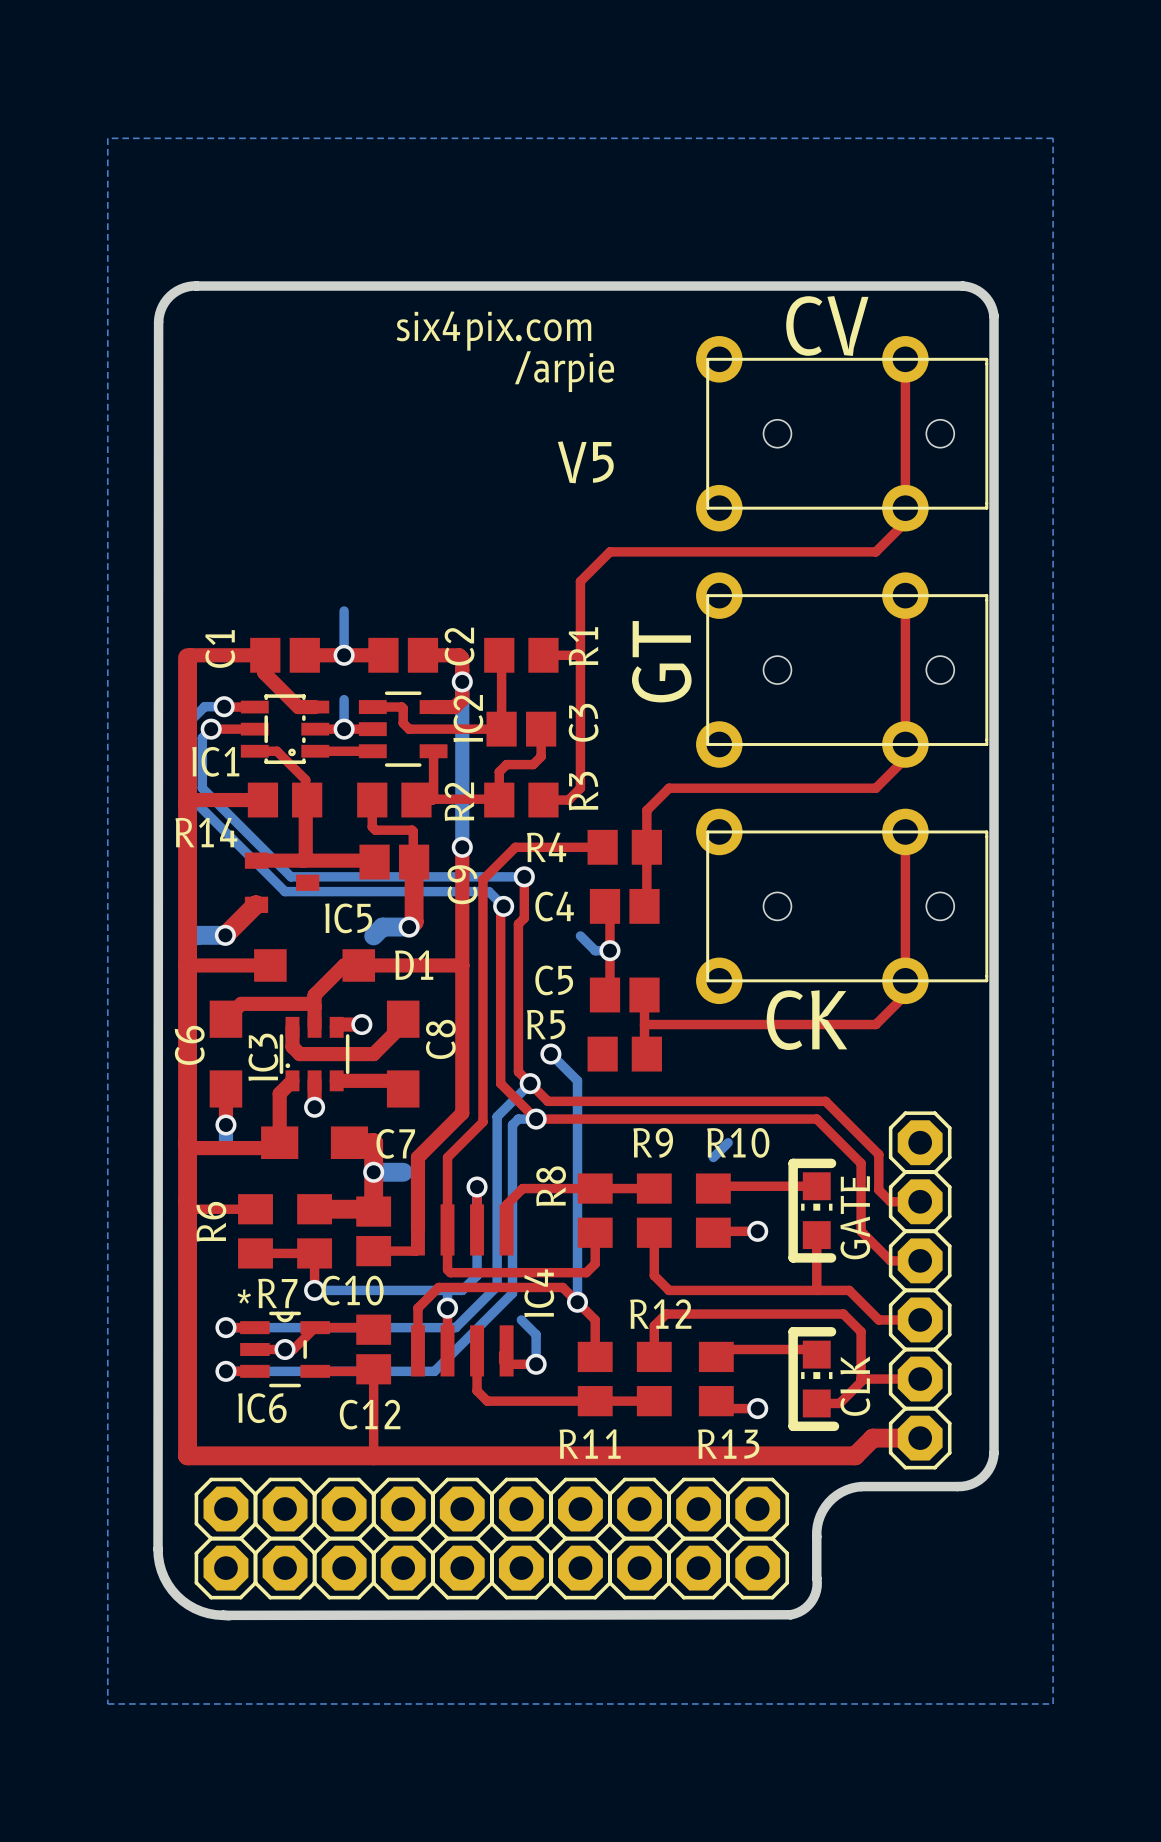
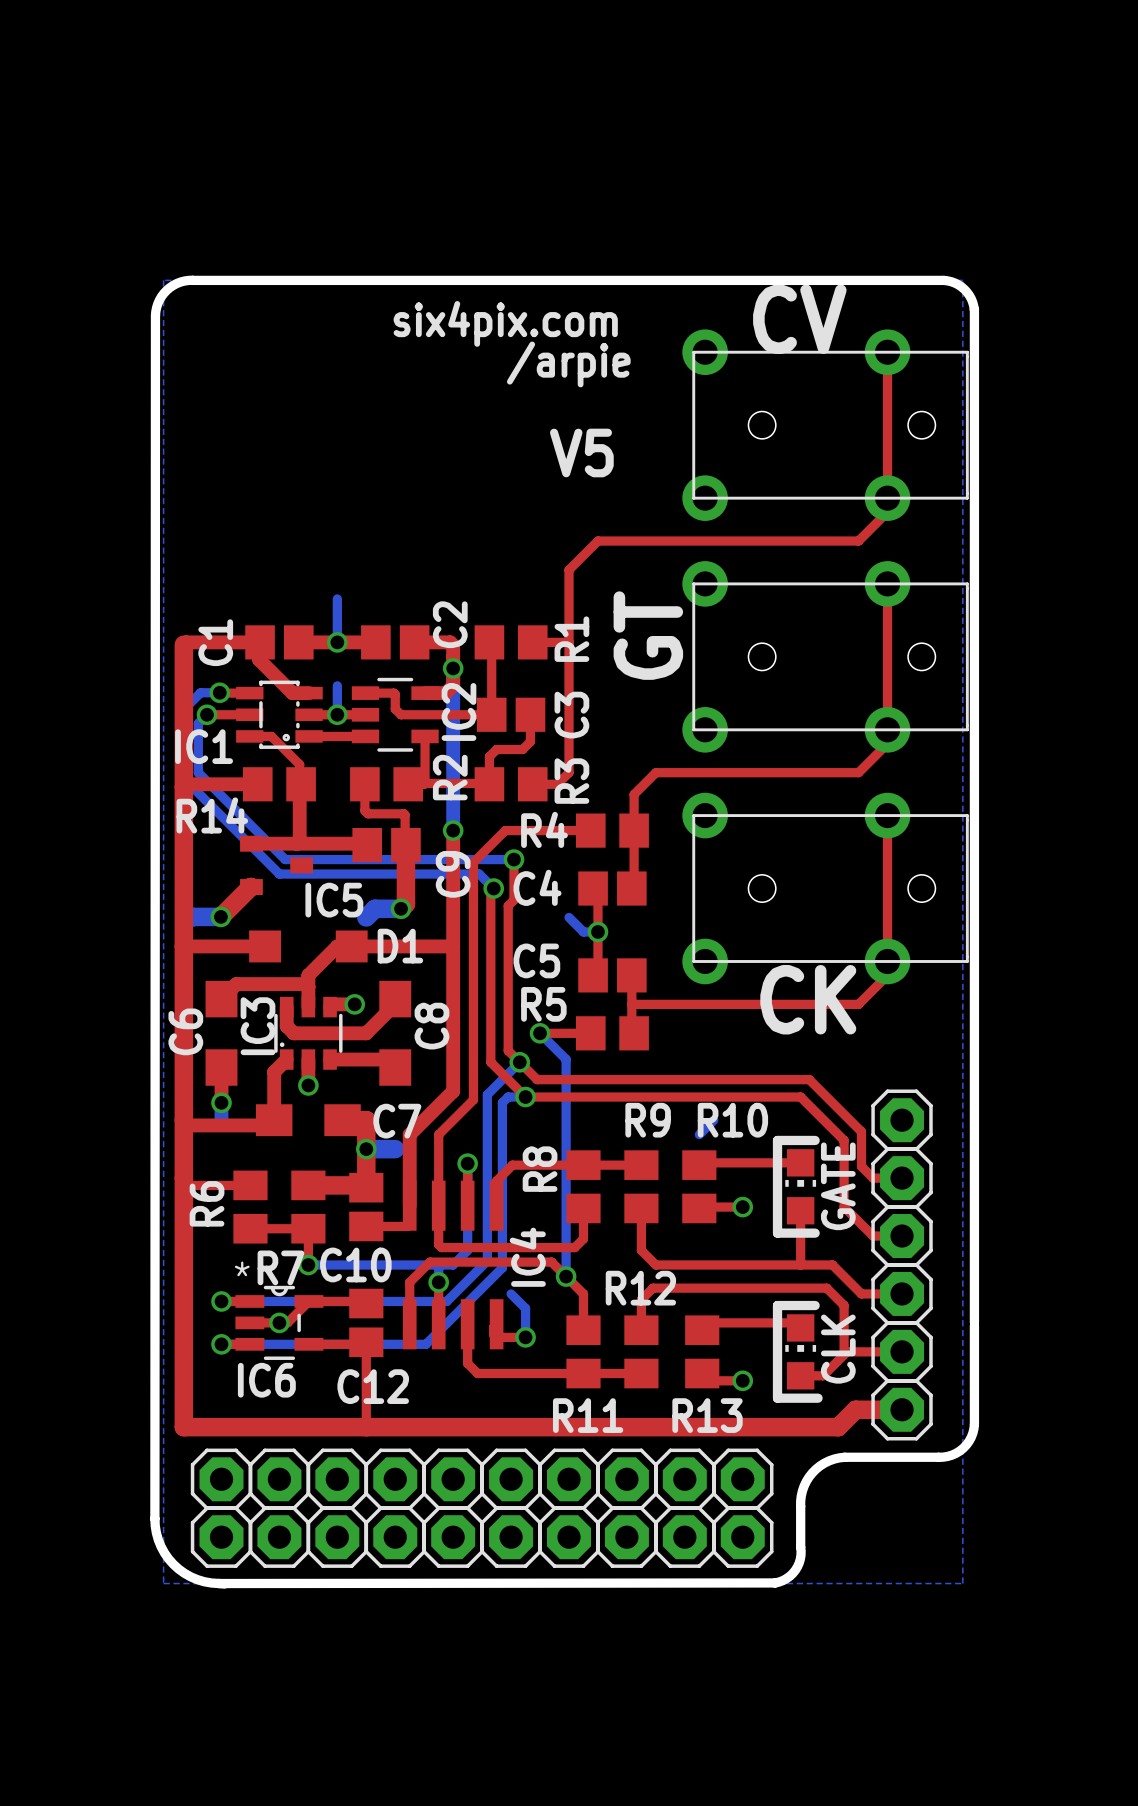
bottom zone outline: (107, 138) (107, 1703) (1053, 1703) (1053, 138) (107, 138) -> (163, 280) (163, 1583) (962, 1583) (962, 280) (163, 280)
top track: none -> (540, 1033) (590, 1033)

